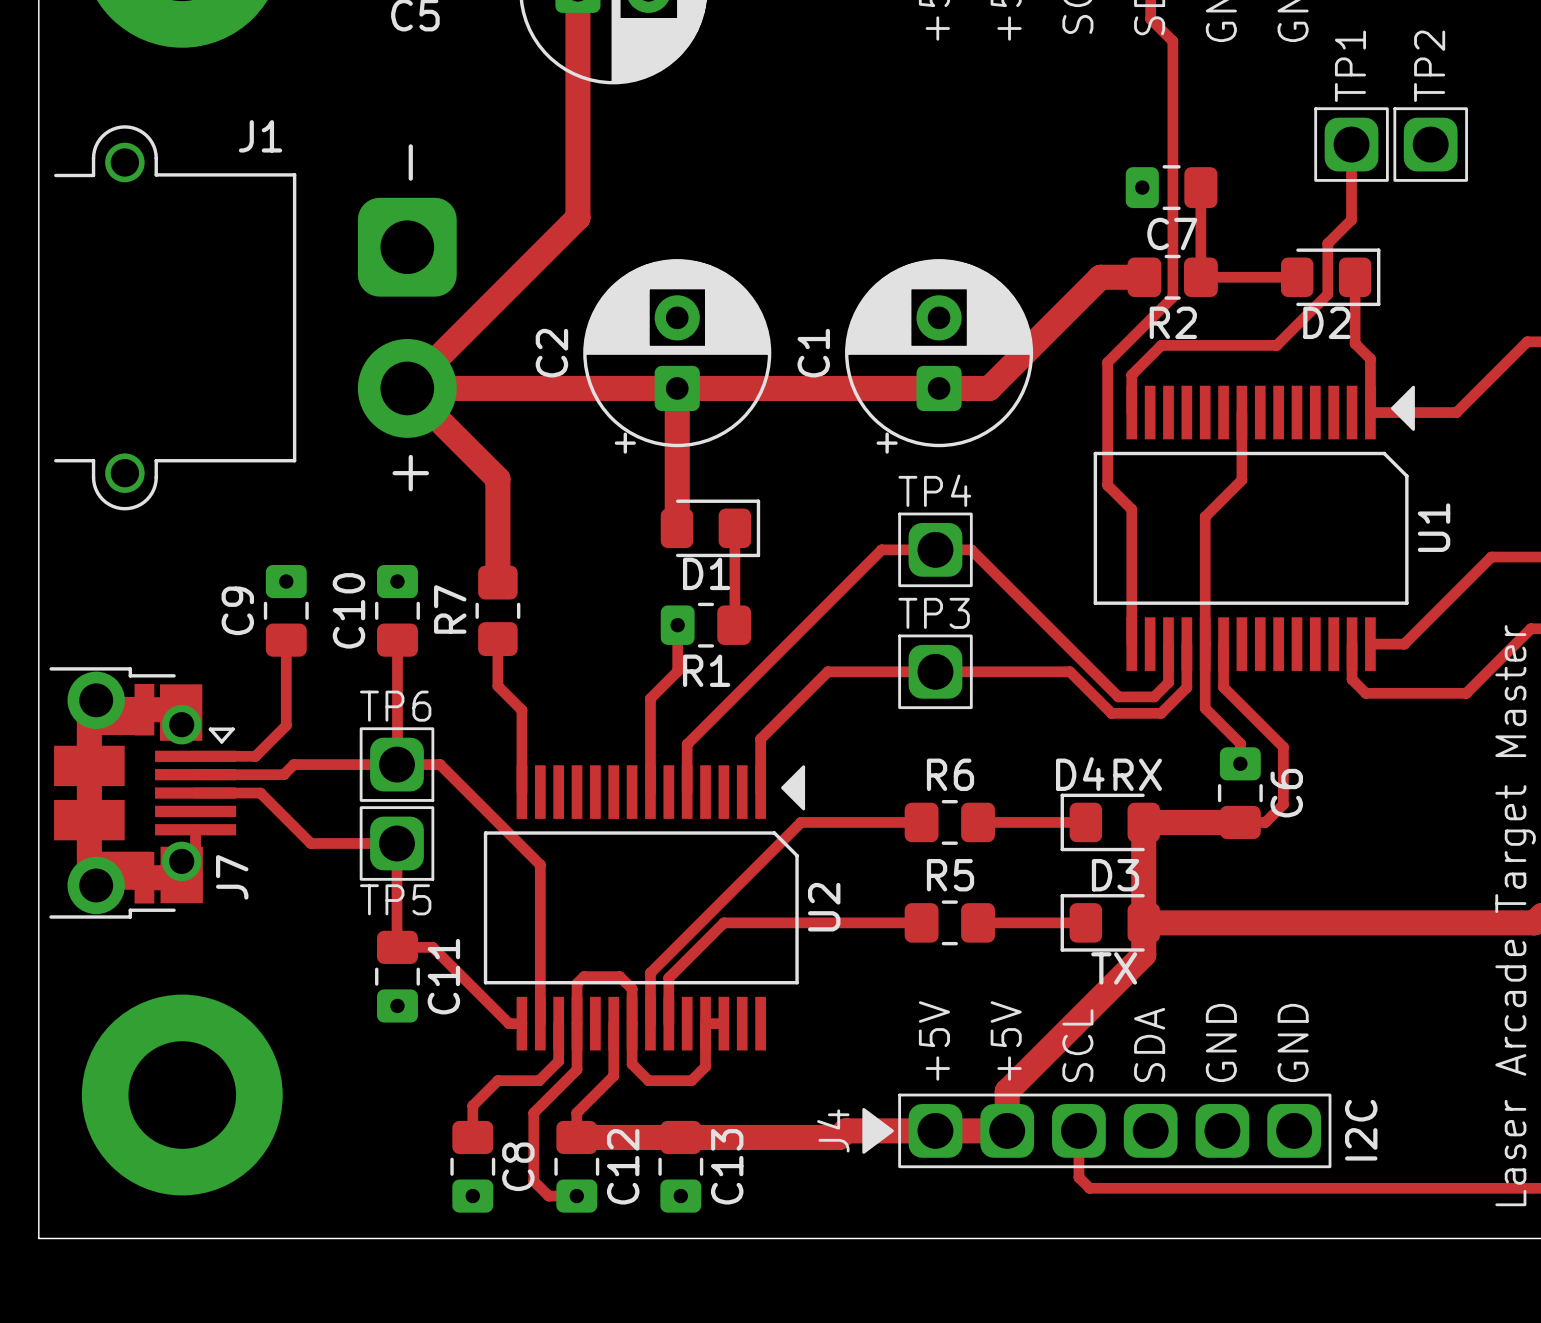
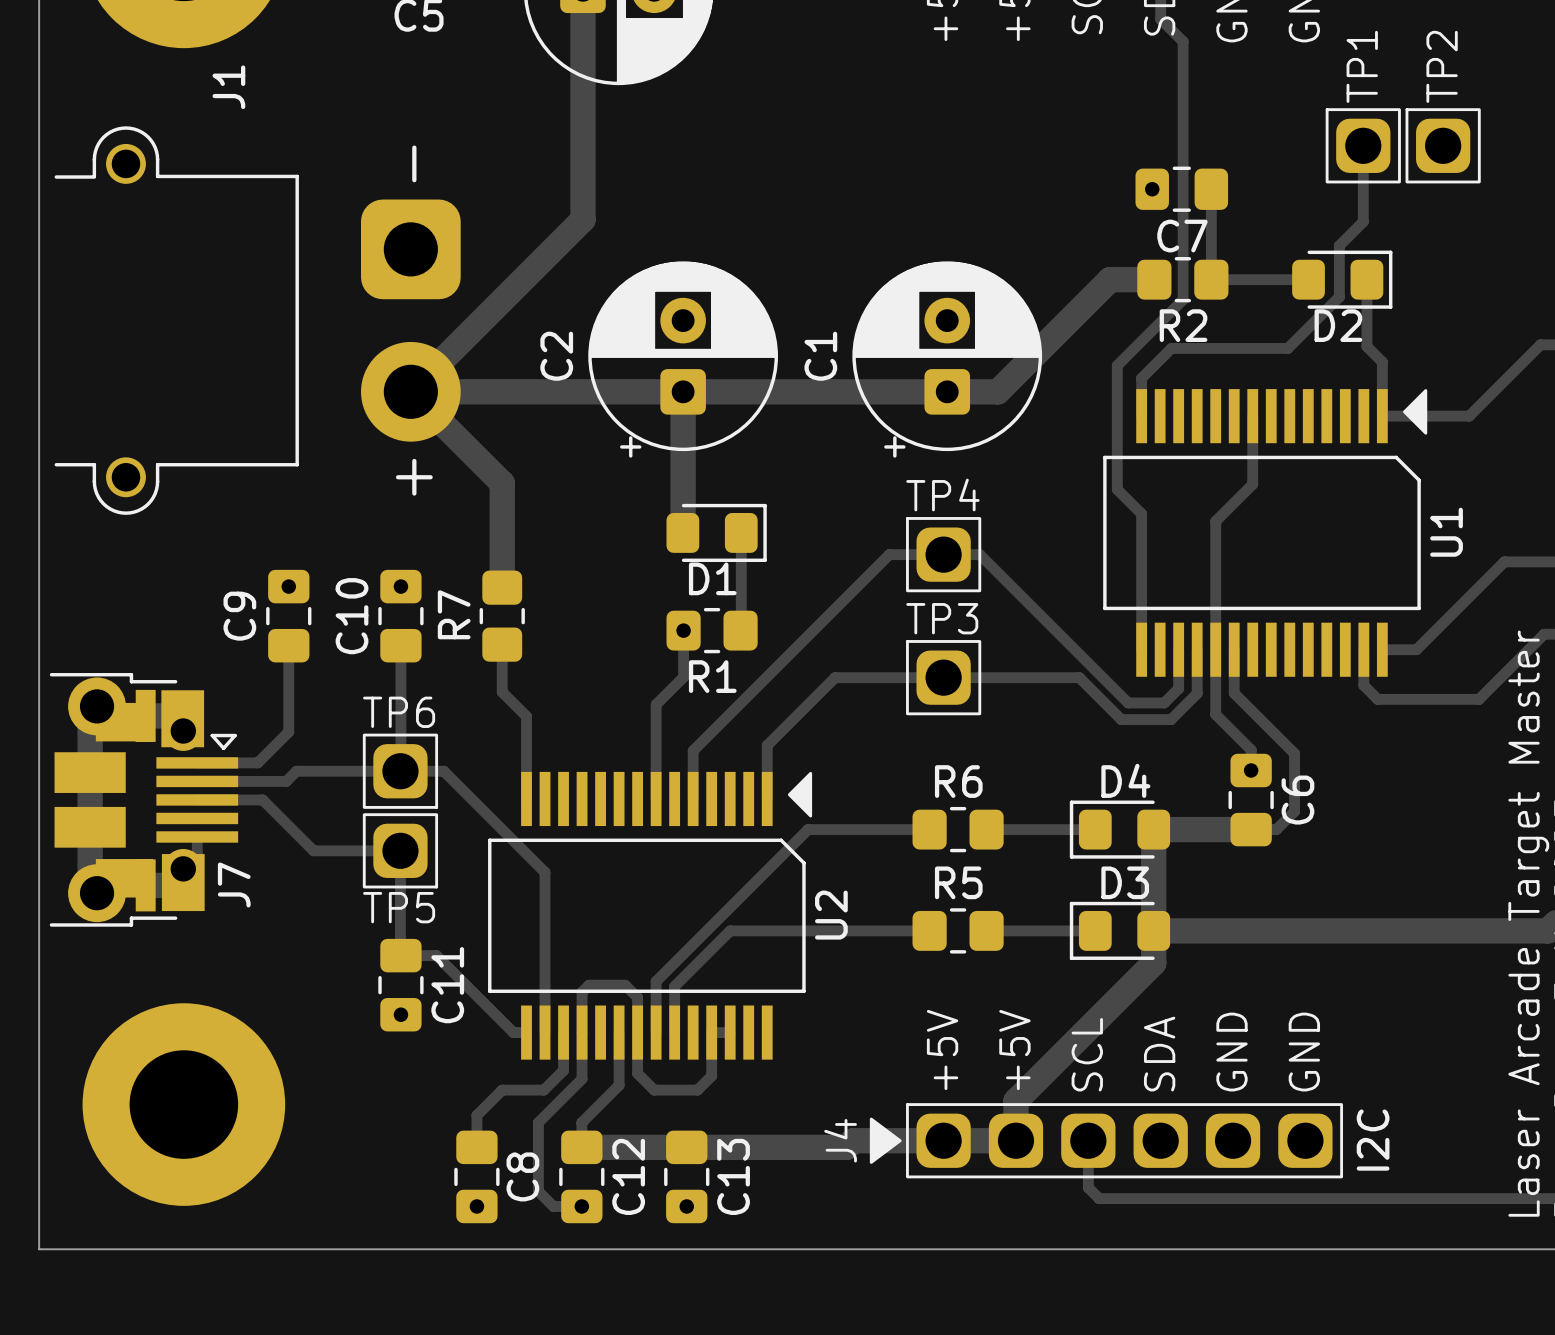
J1 name rotation: 0° (260, 136) -> 90° counterclockwise (228, 87)
D4 name position: D4 (1080, 774) -> D4 (1125, 780)
D4 value: RX (1137, 774) -> none
D3 value: TX (1114, 968) -> none

